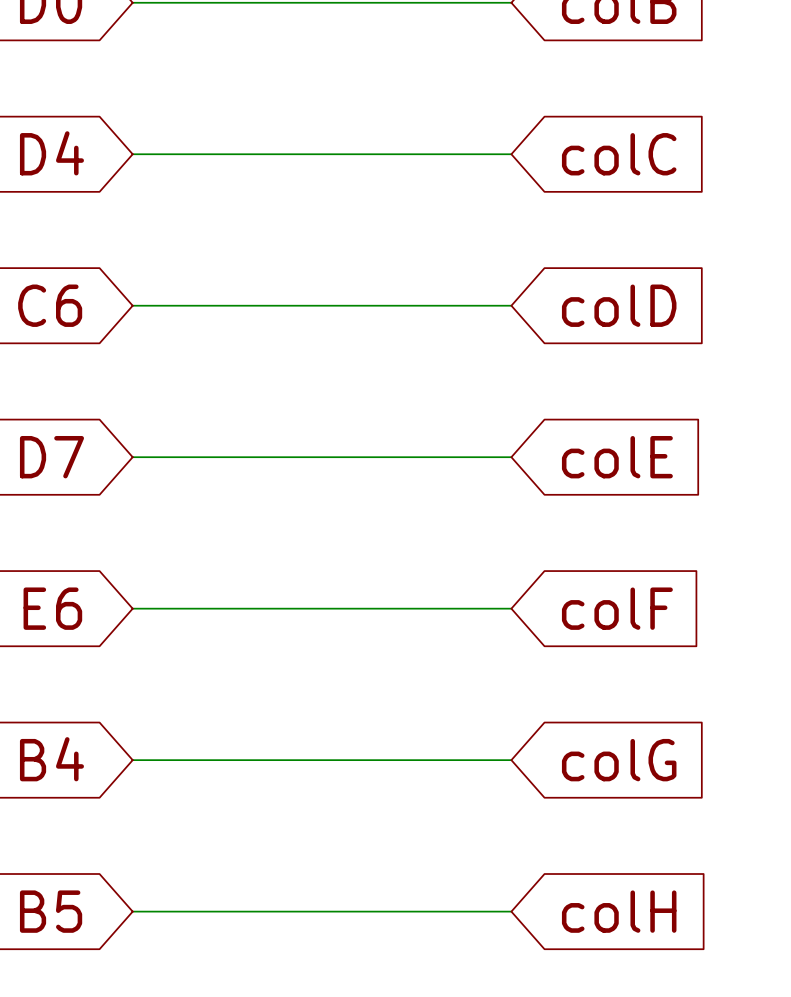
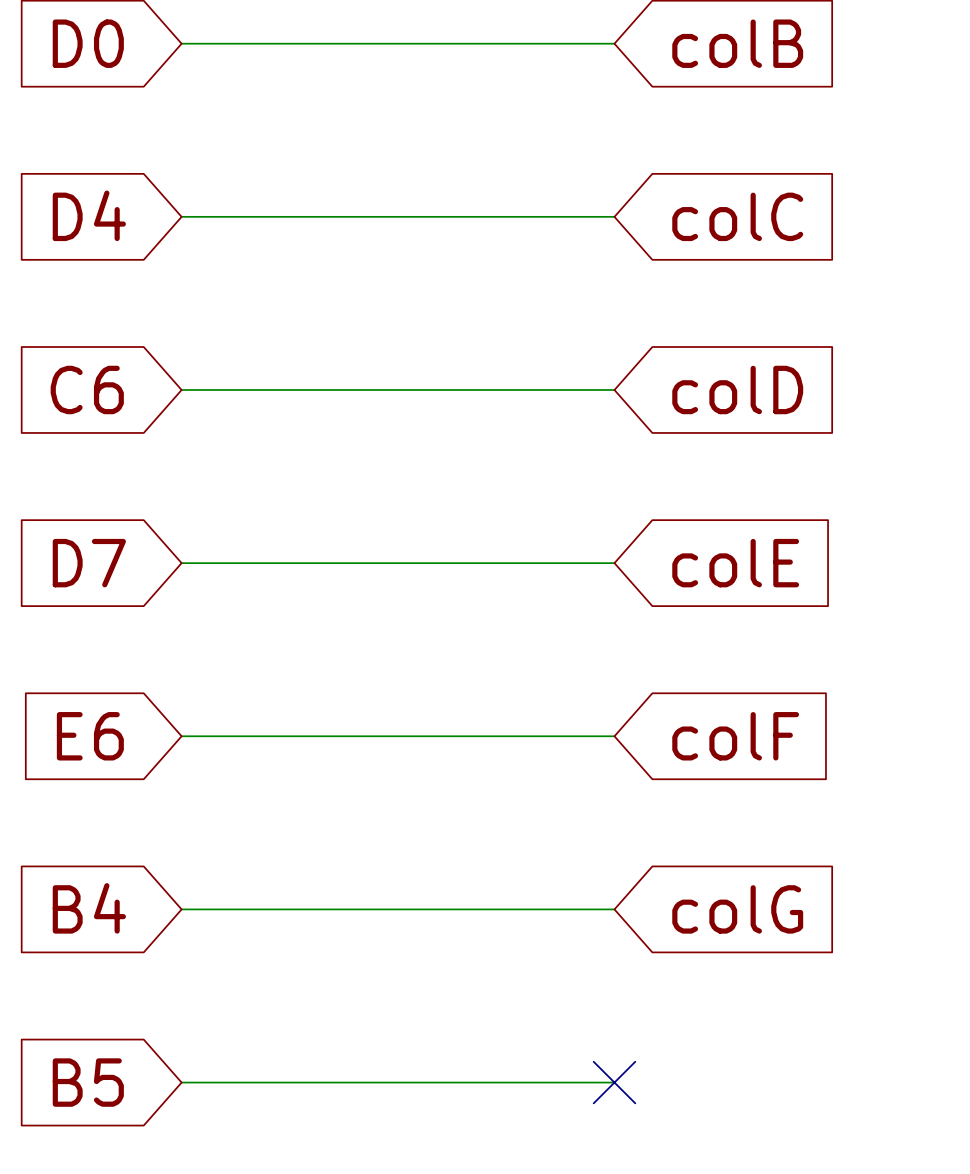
no-connect mark: none -> (614, 1082)
global label: colH (619, 911) -> none

